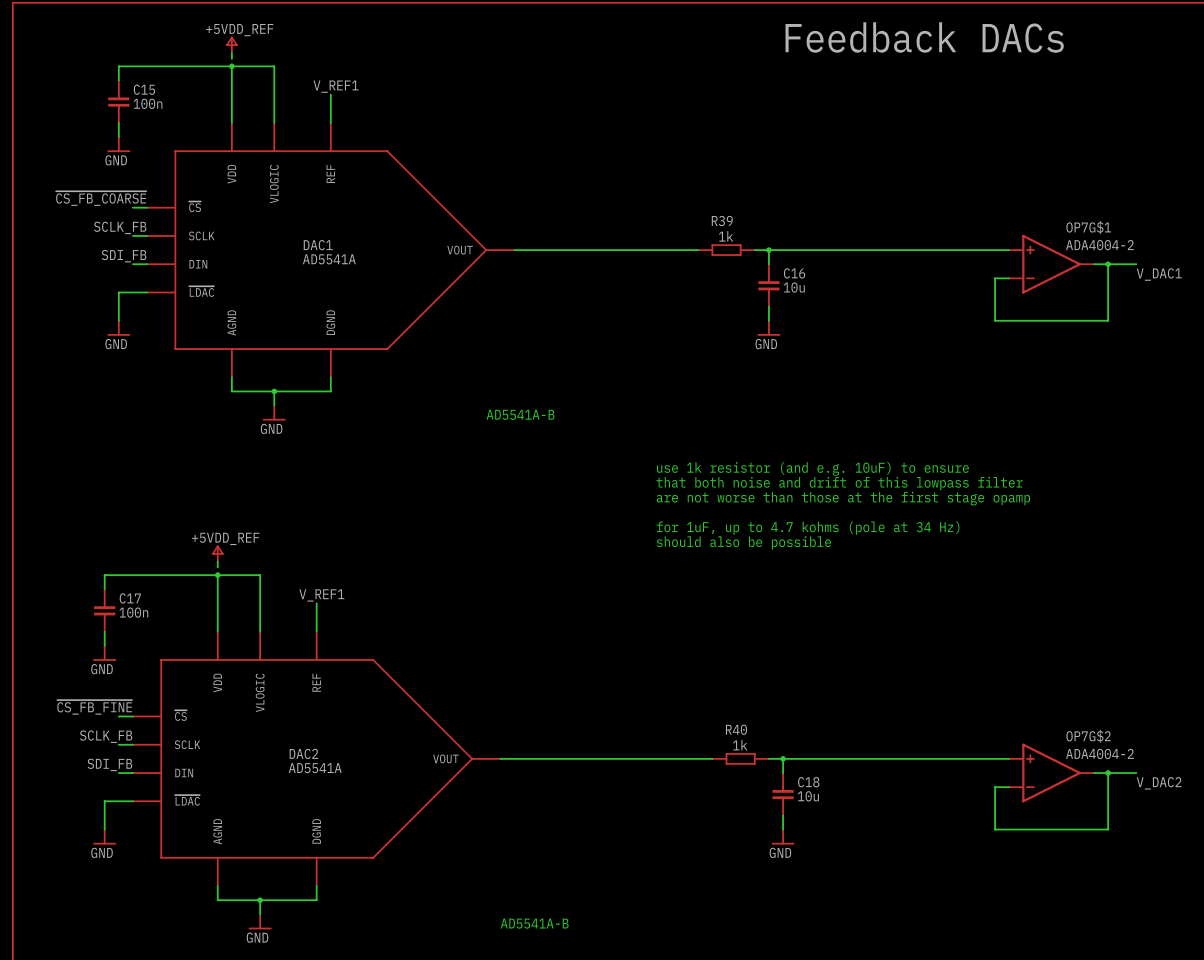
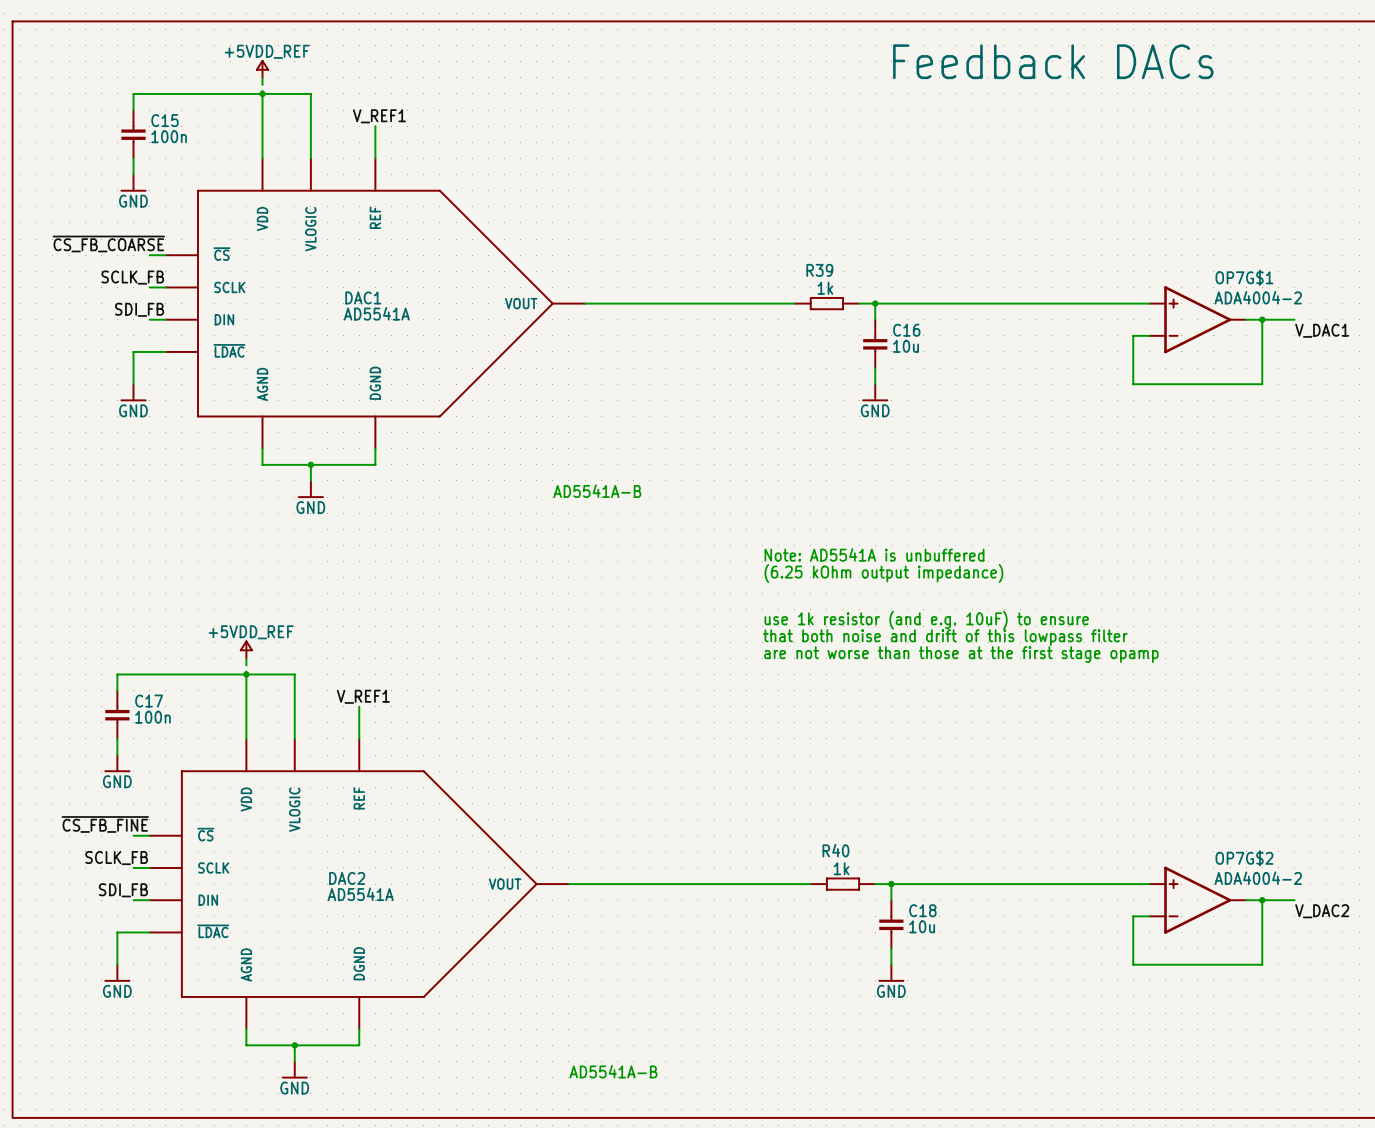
text position: use 1k resistor (and e.g. 10uF) to ensure (812, 468) -> use 1k resistor (and e.g. 10uF) to ensure (926, 620)
text: none -> Note: AD5541A is unbuffered (874, 554)
text position: that both noise and drift of this lowpass filter (839, 483) -> that both noise and drift of this lowpass filter (945, 637)
text: none -> (6.25 kOhm output impedance) (883, 573)
text position: are not worse than those at the first stage opamp (843, 498) -> are not worse than those at the first stage opamp (961, 654)
text: for 1uF, up to 4.7 kohms (pole at 34 Hz) (808, 528) -> none
text: should also be possible (743, 543) -> none

